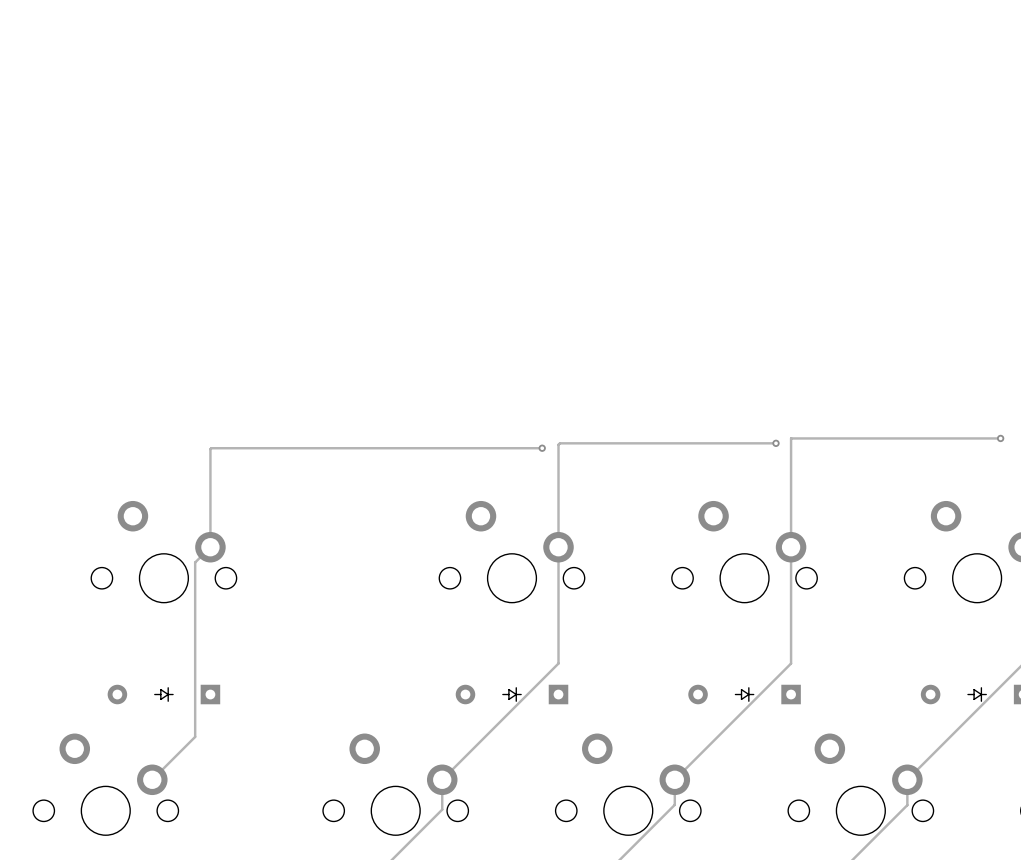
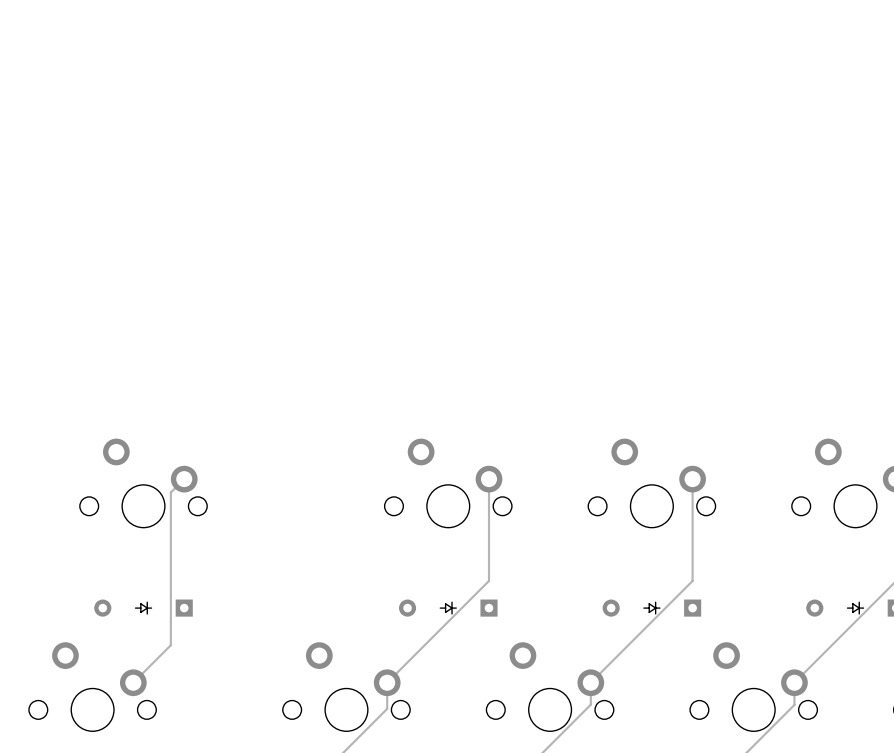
track: (1000, 438) (791, 438) (791, 547) -> none
via: (1000, 438) -> none
track: (776, 443) (559, 443) (558, 547) -> none
via: (776, 443) -> none
track: (542, 448) (211, 448) (210, 547) -> none
via: (542, 448) -> none

